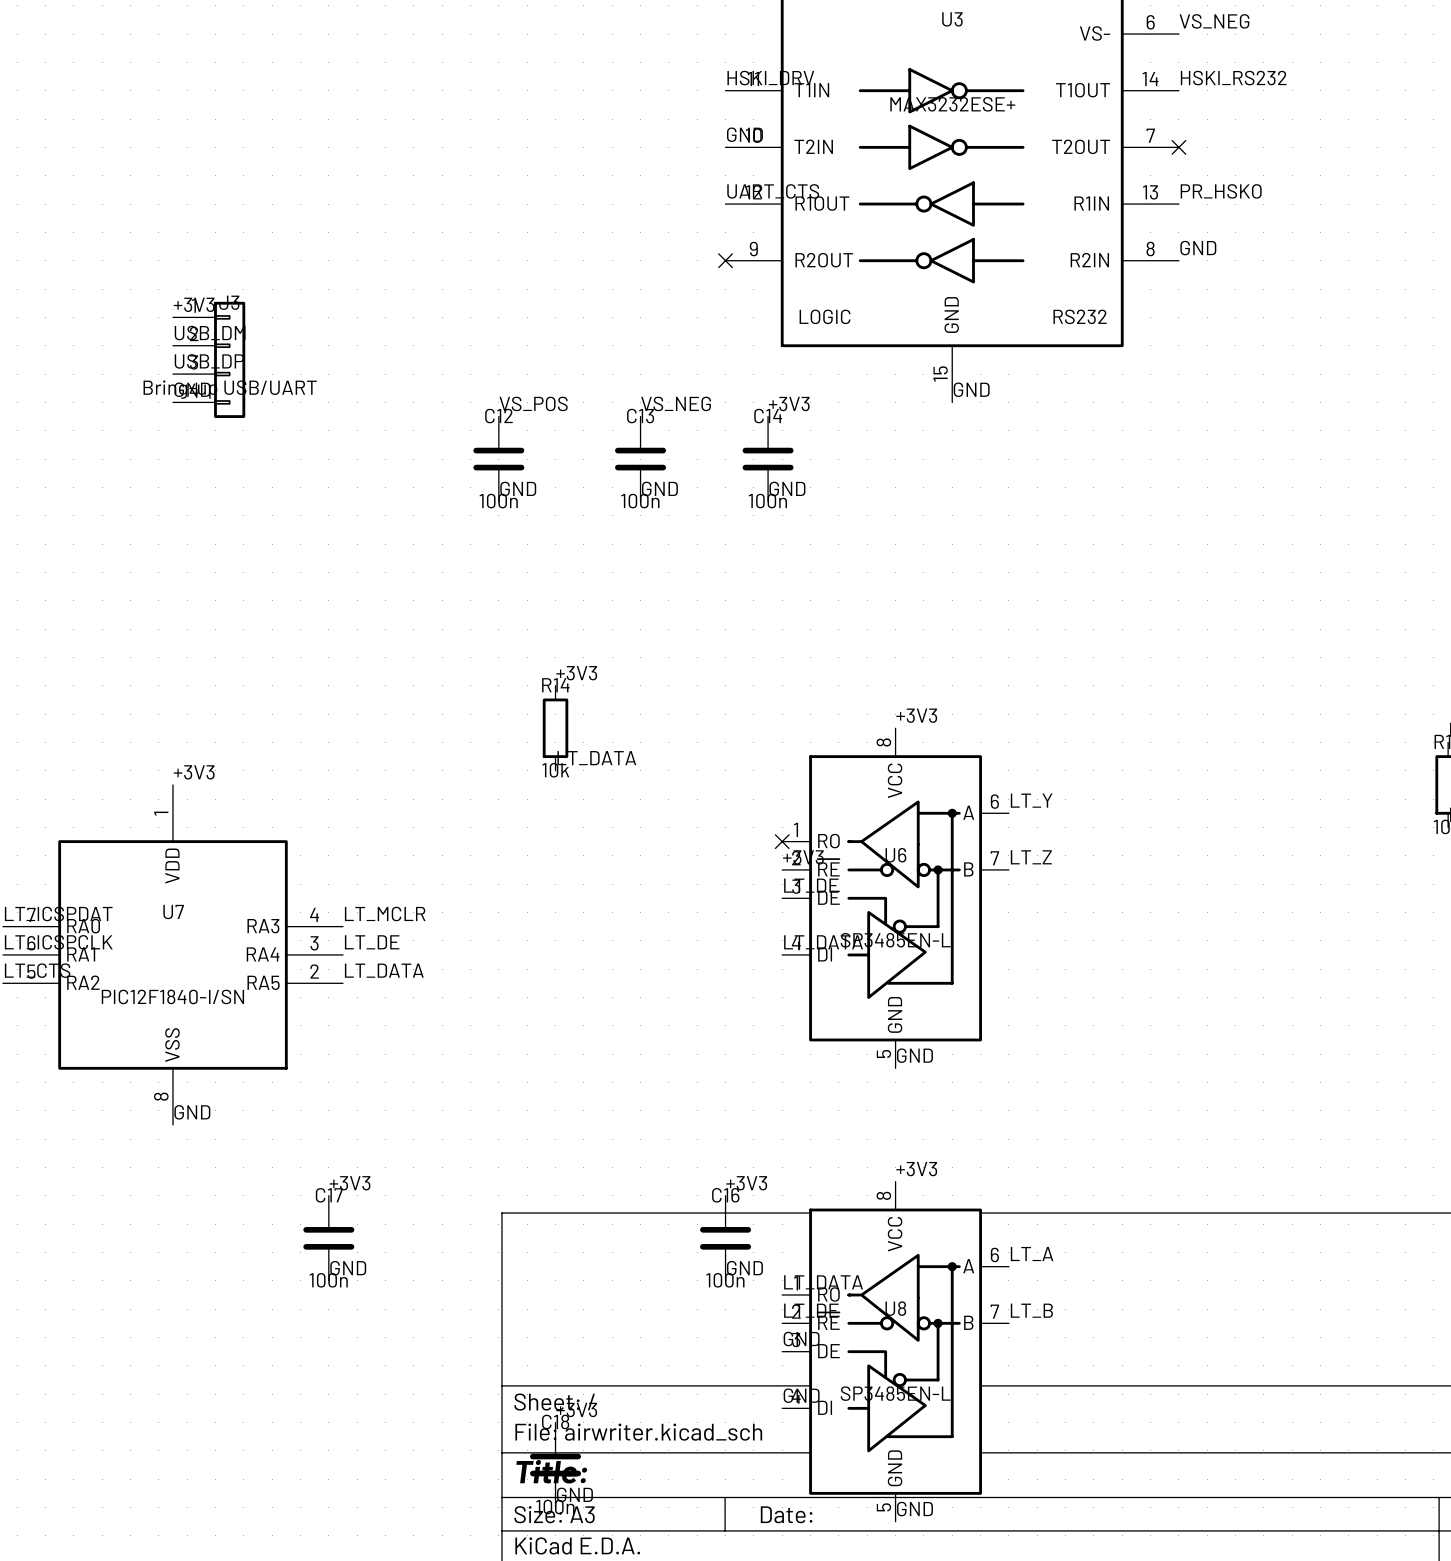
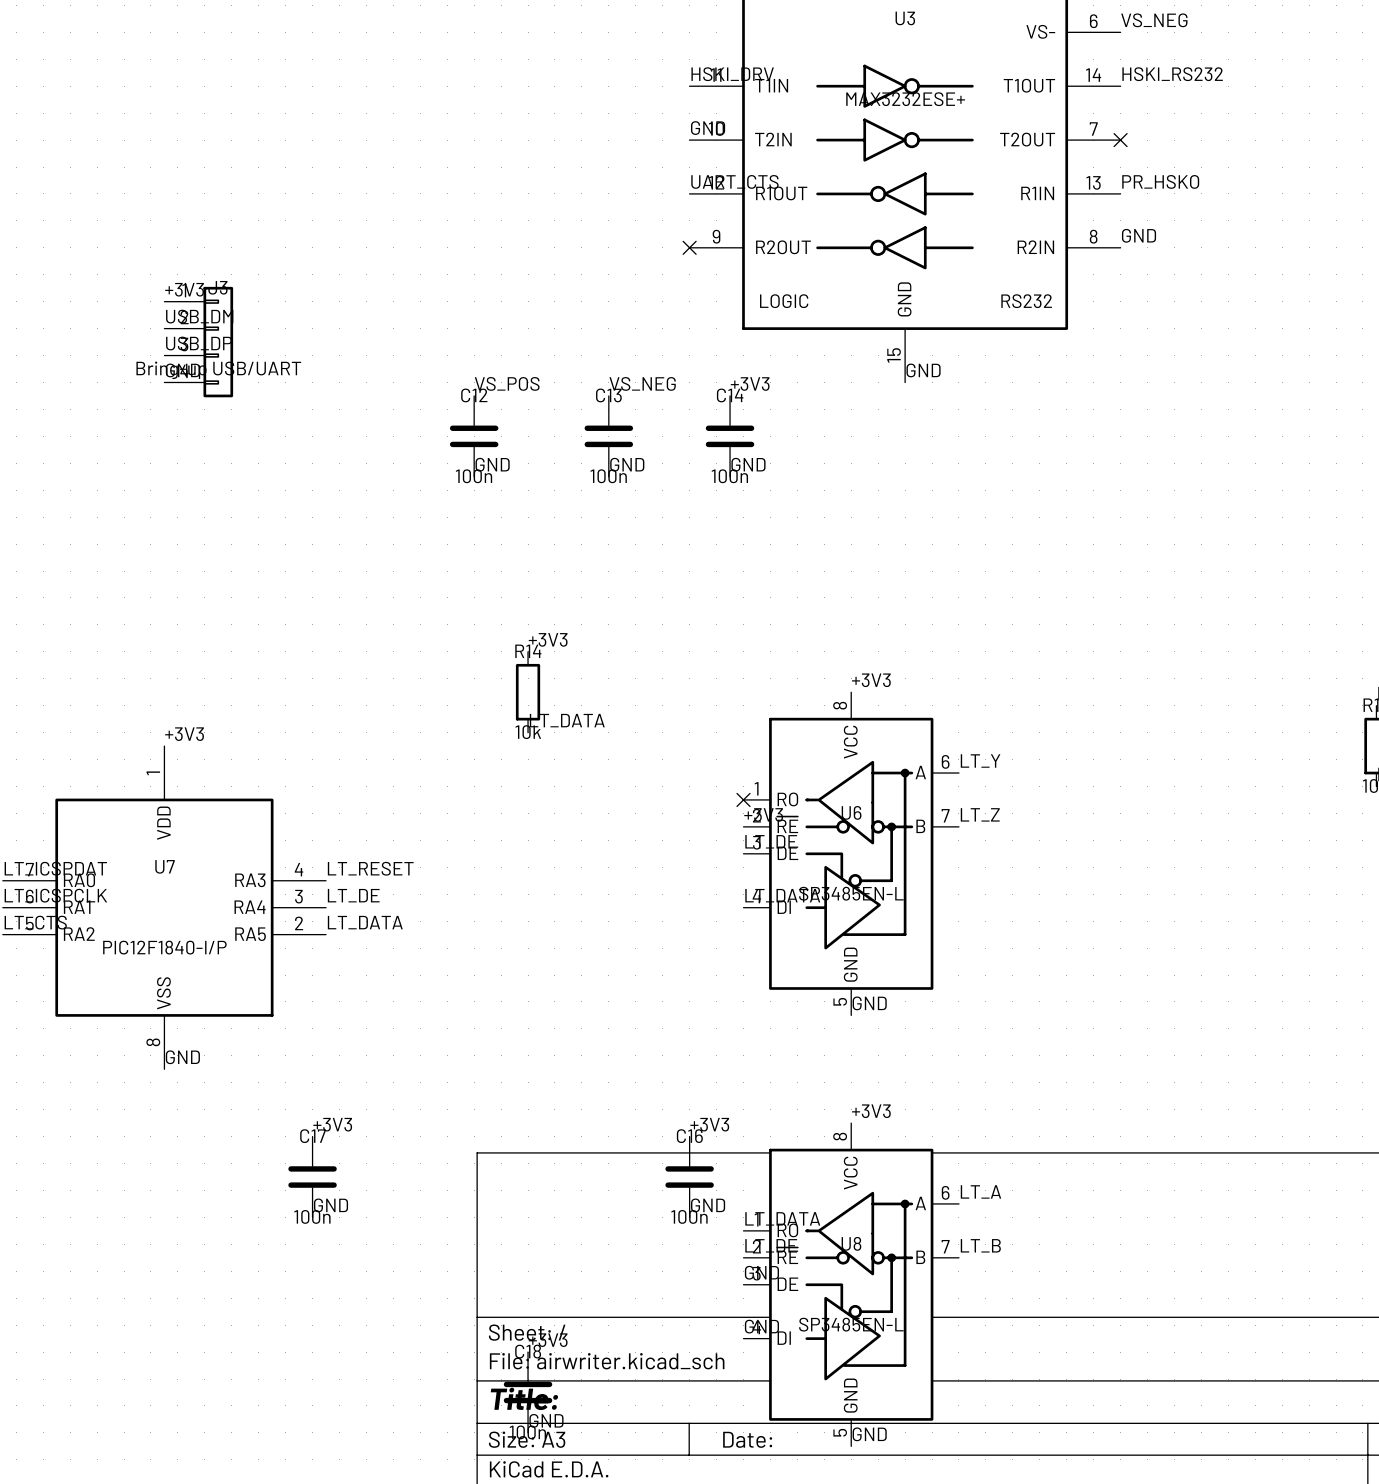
label: LT_MCLR (385, 913) -> LT_RESET (370, 868)
U7 value: PIC12F1840-I/SN (172, 996) -> PIC12F1840-I/P (164, 947)

